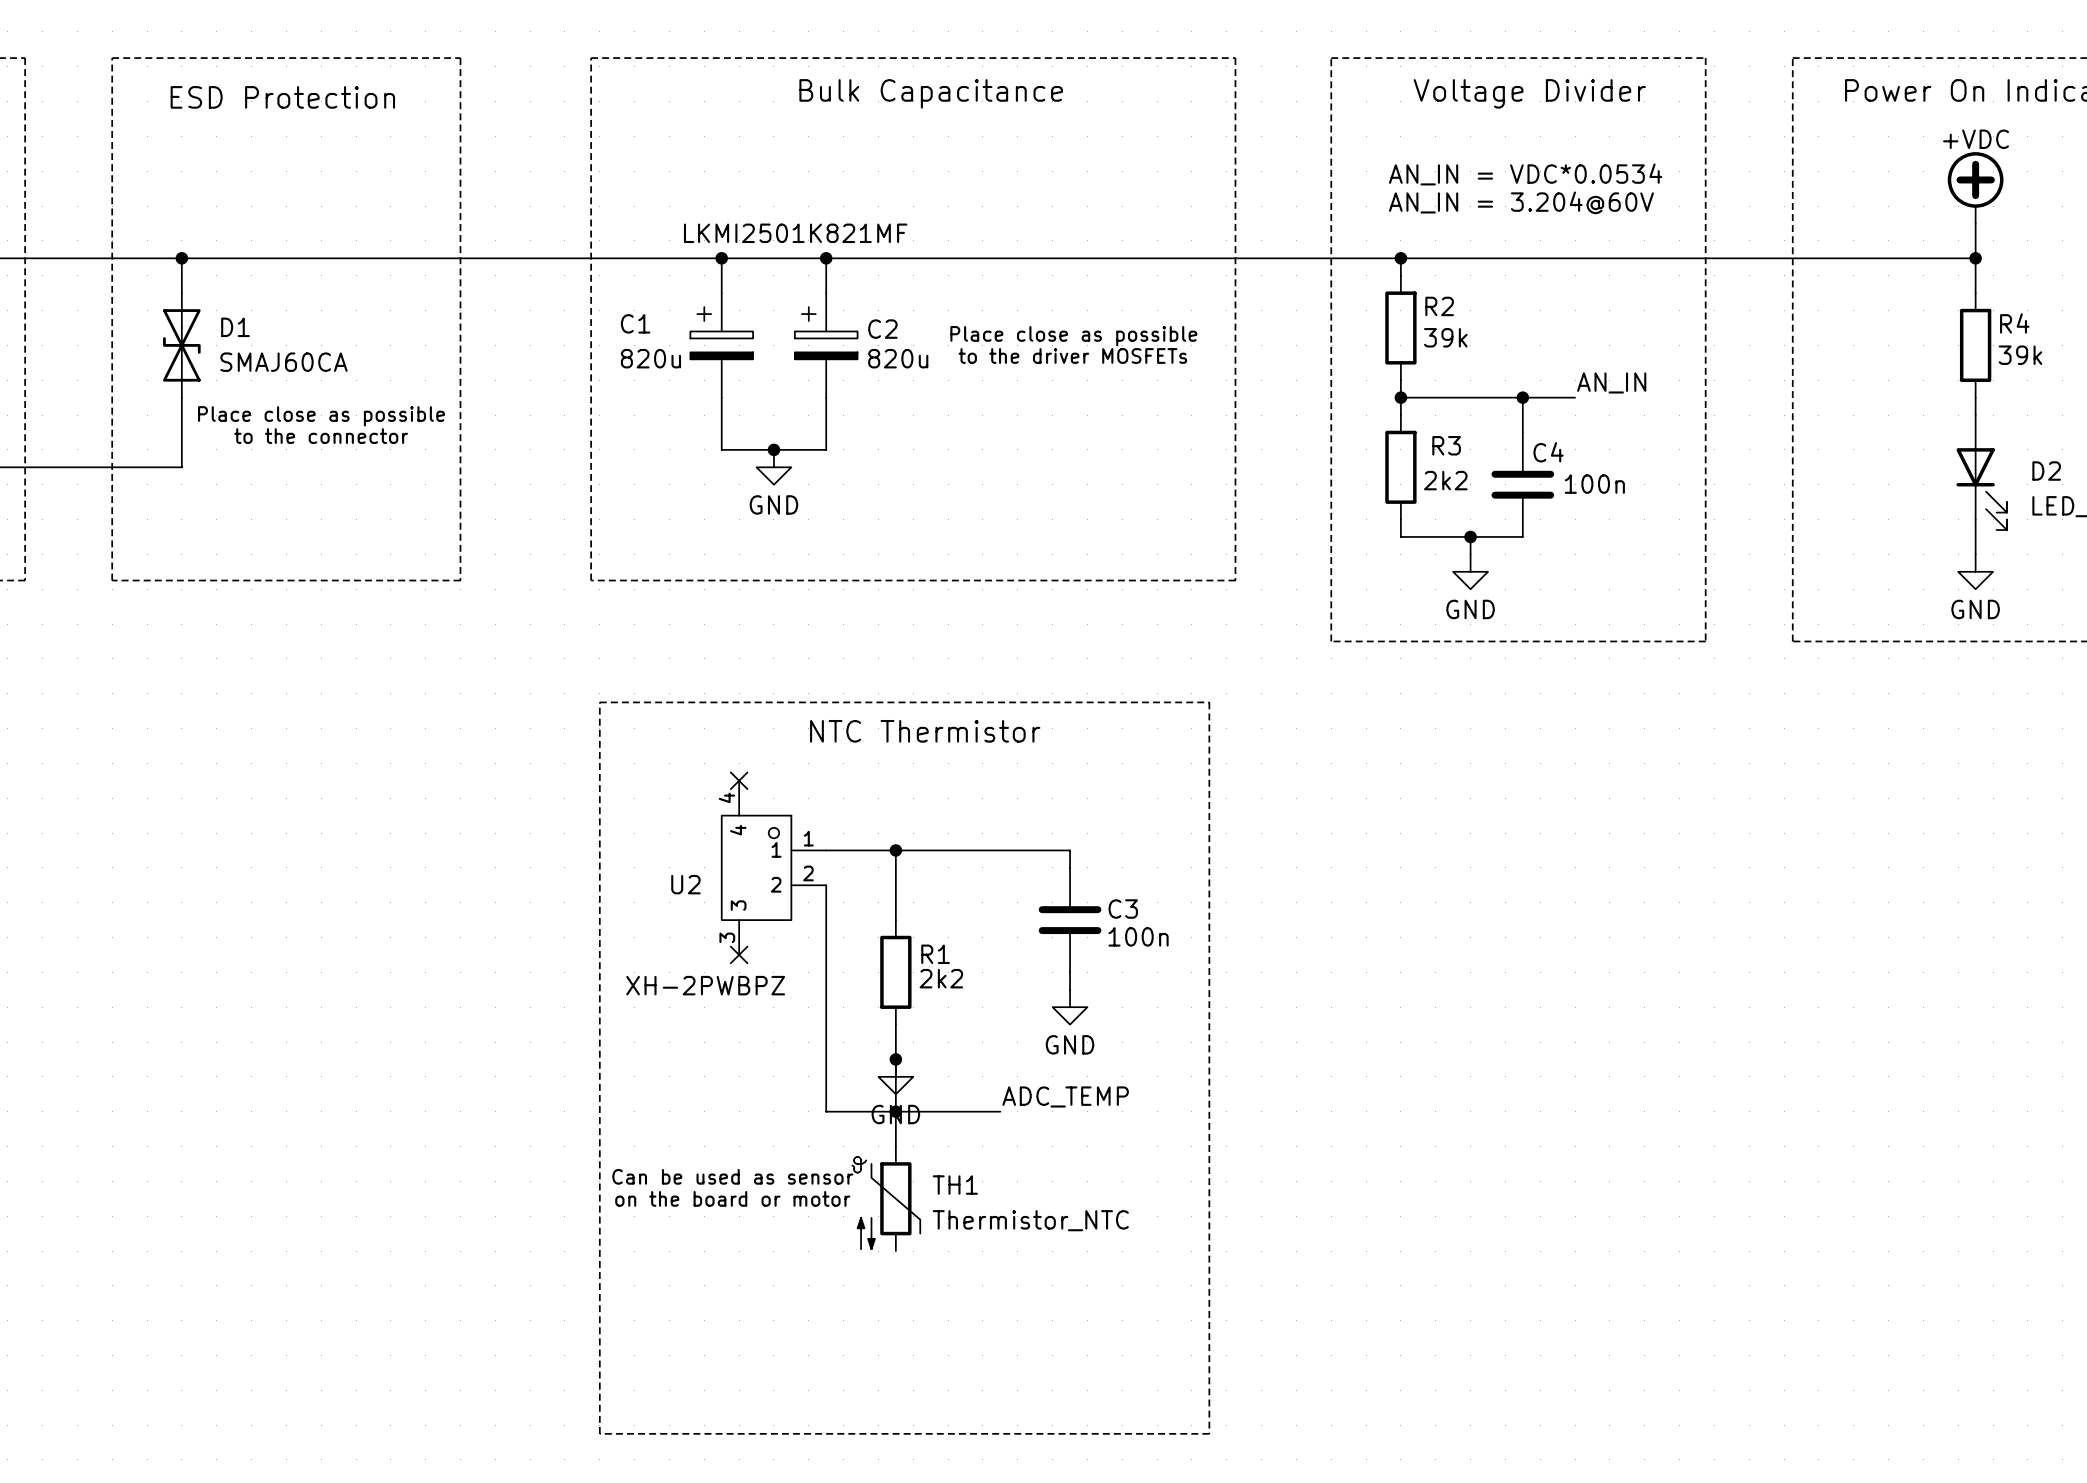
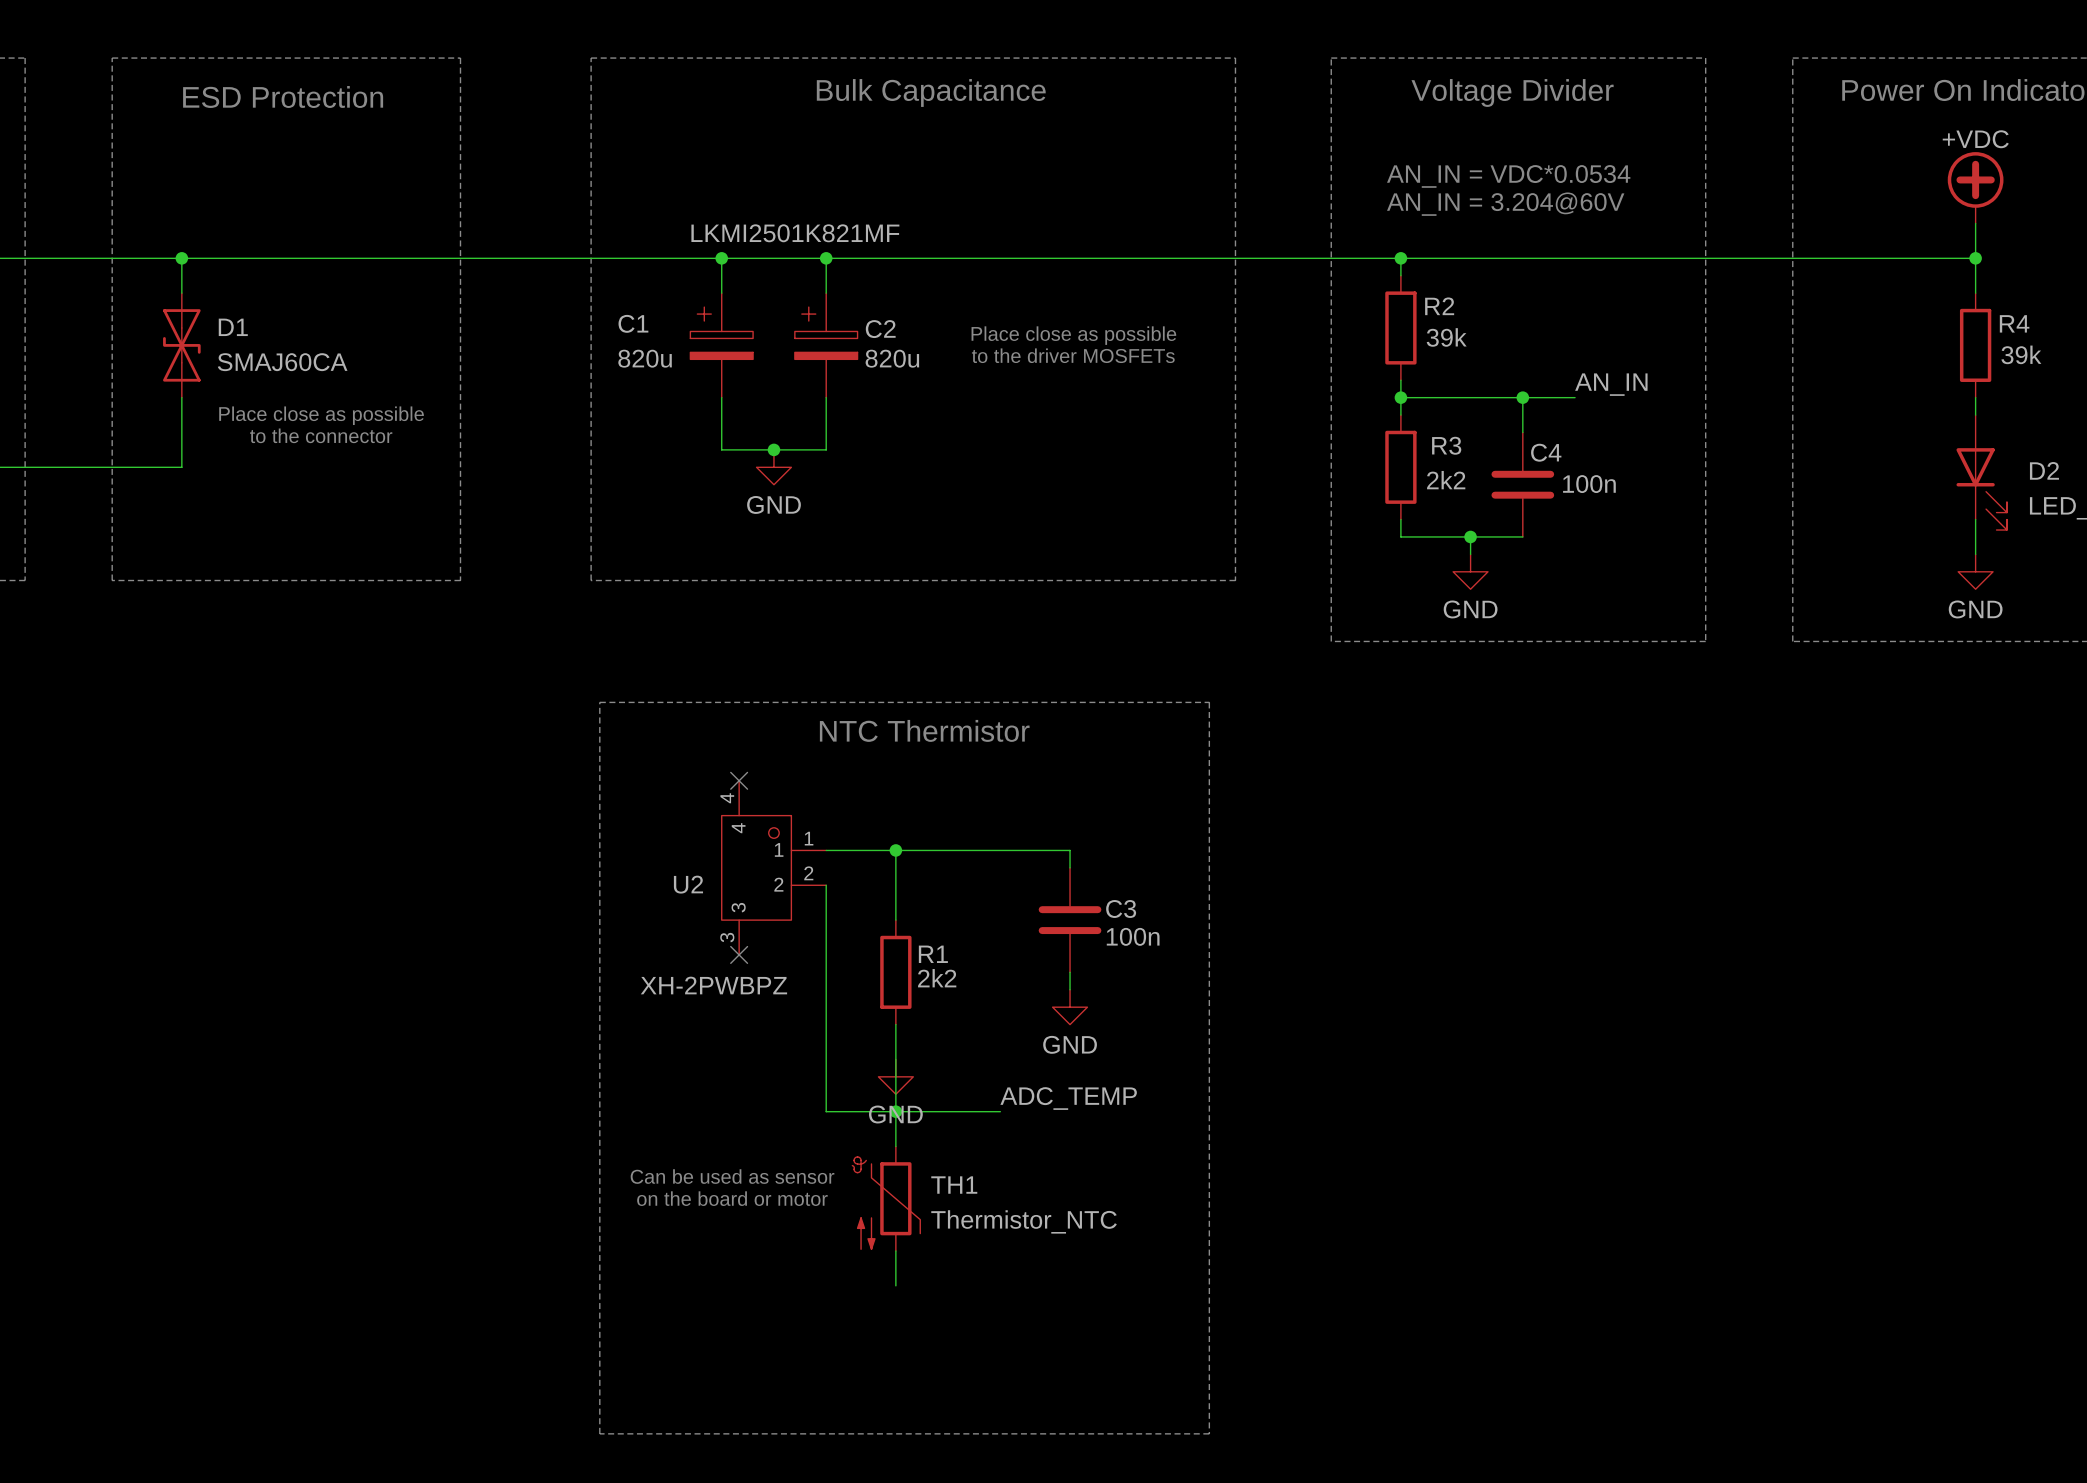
junction: (895, 1059) -> none
wire: none -> (895, 1251) (895, 1285)

